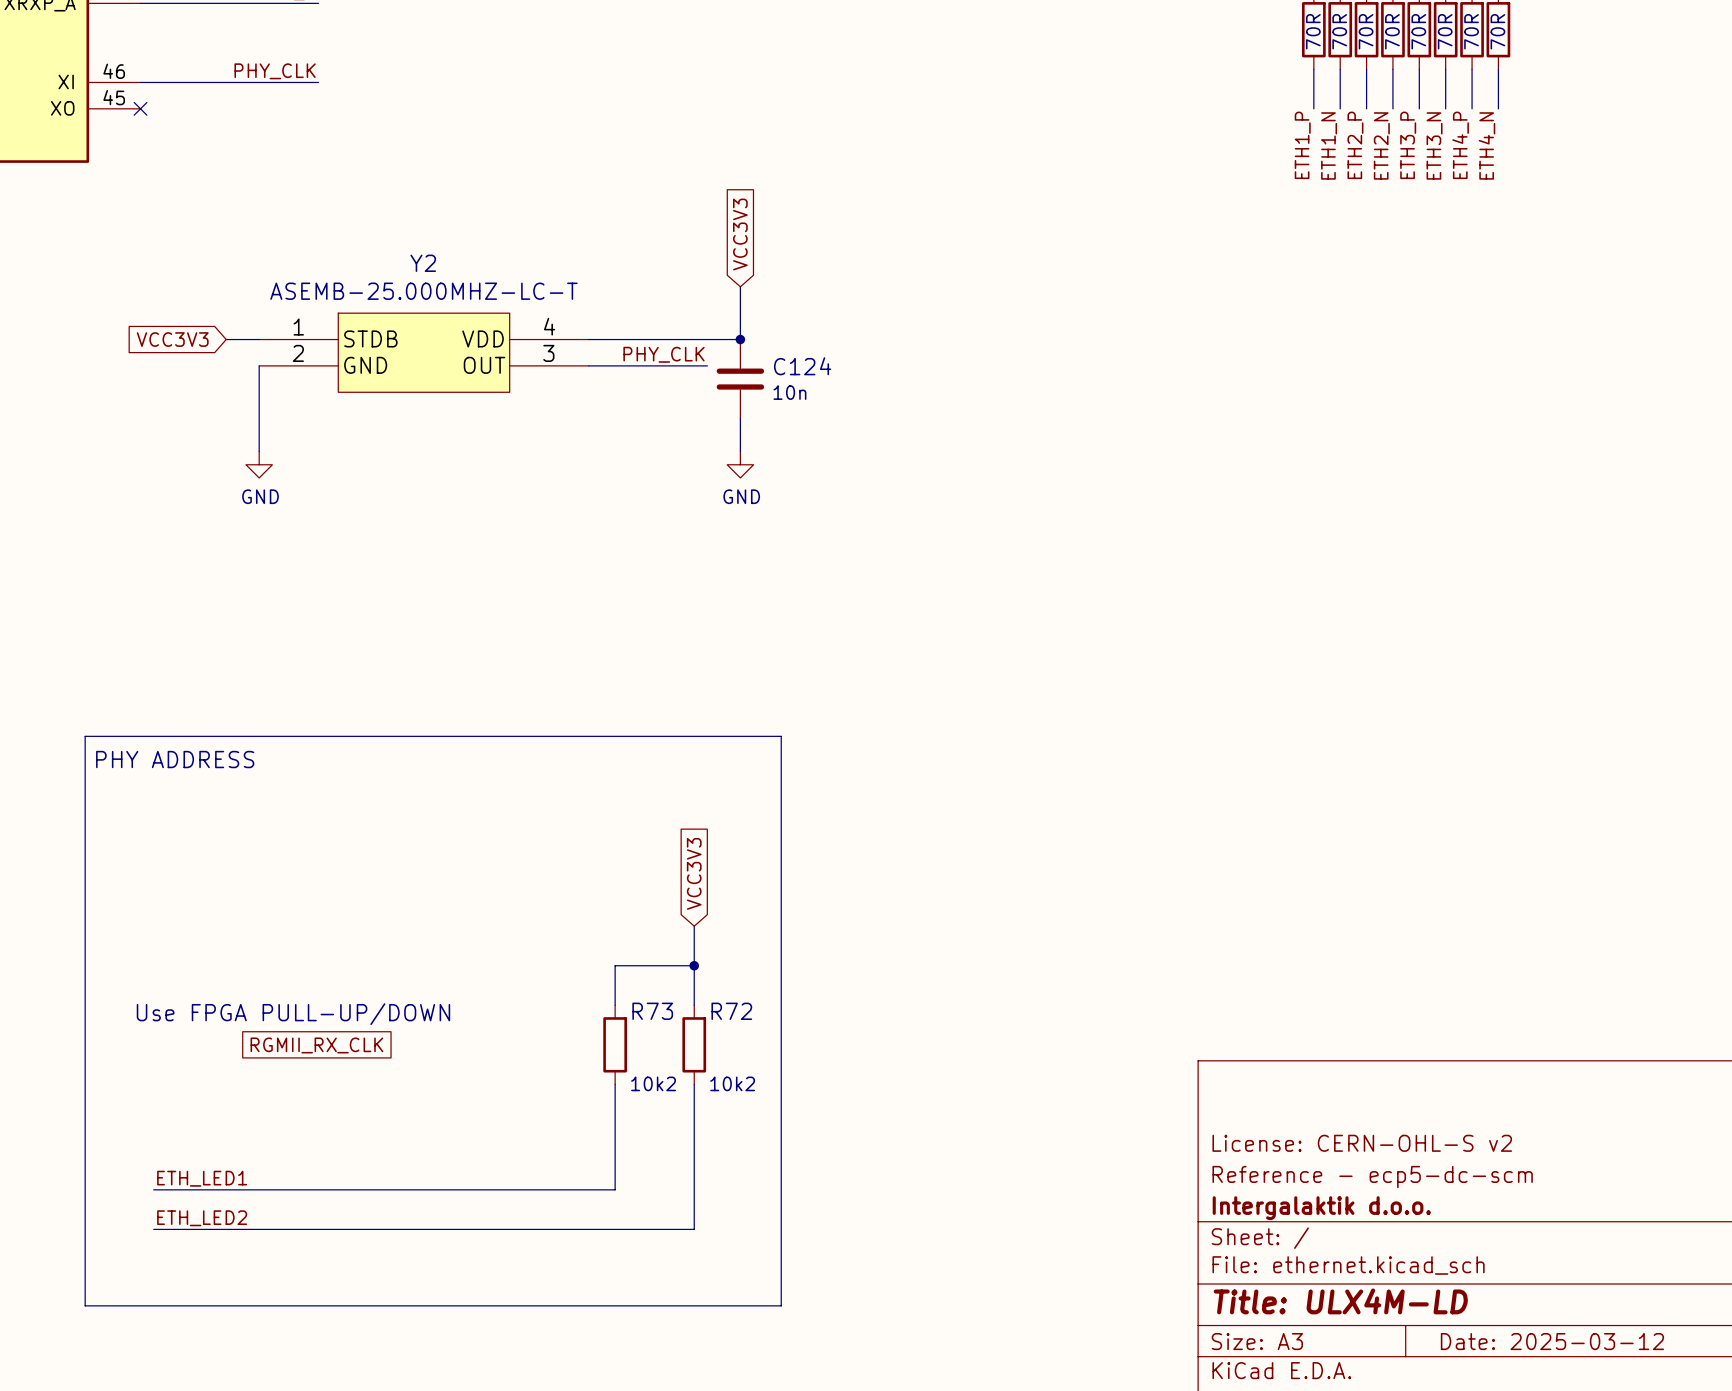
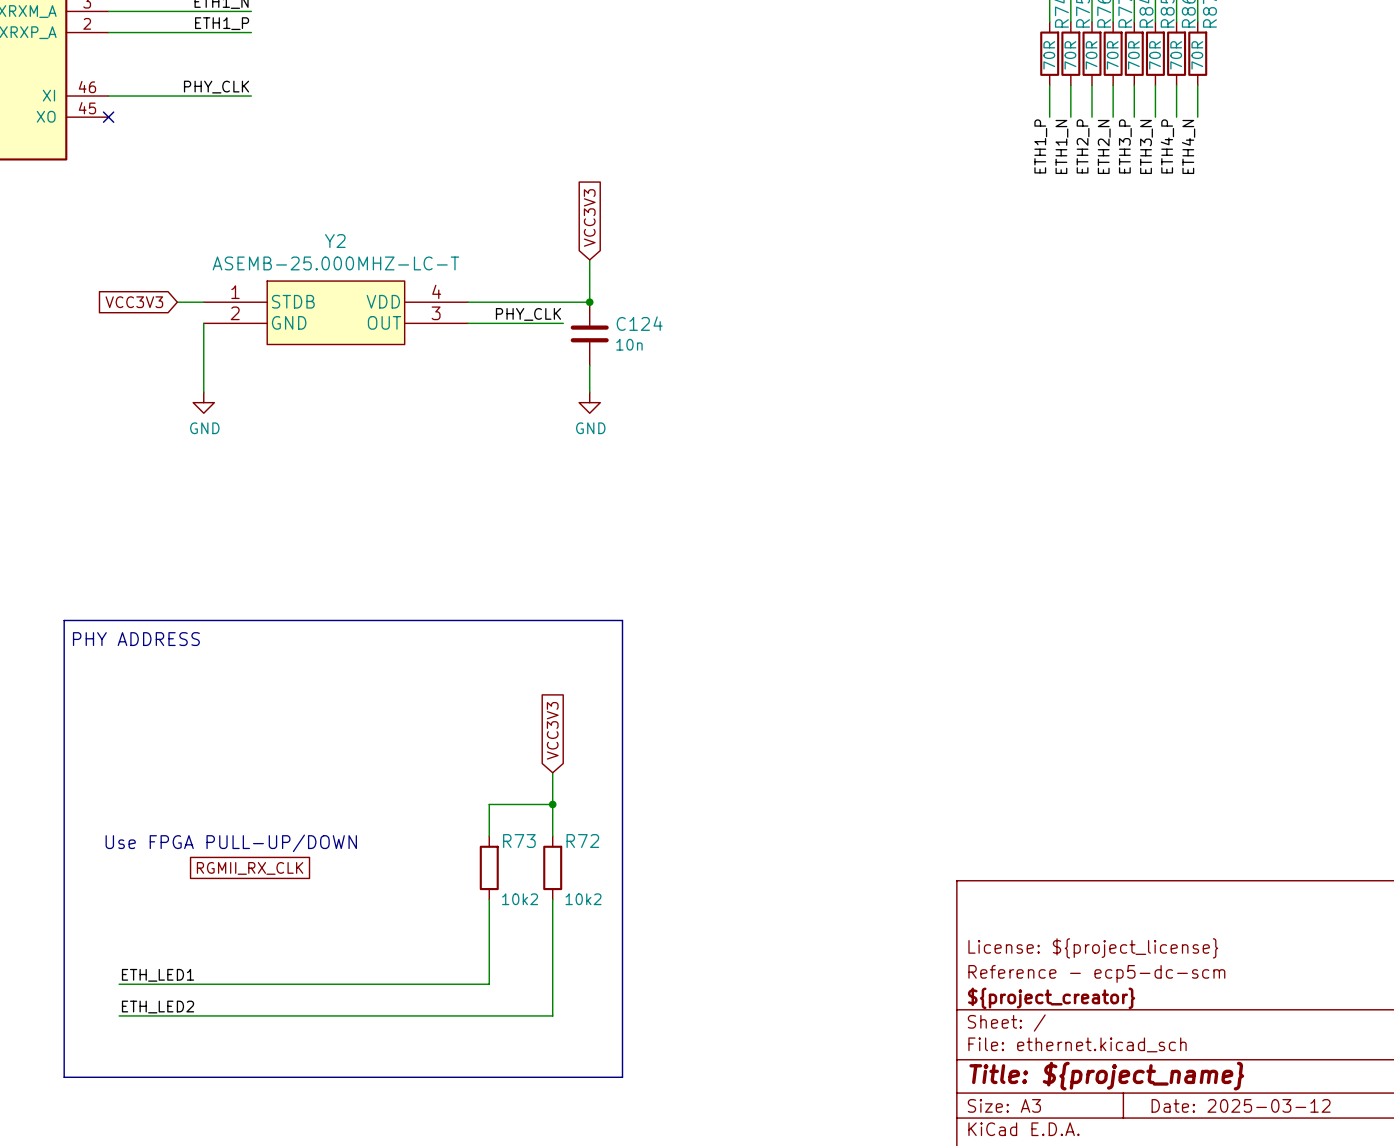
title block: License: CERN-OHL-S v2 (1362, 1143) -> License: ${project_license} (1093, 948)
title block: Intergalaktik d.o.o. (1321, 1208) -> ${project_creator} (1051, 998)
title block: Title: ULX4M-LD (1340, 1301) -> Title: ${project_name} (1106, 1076)

